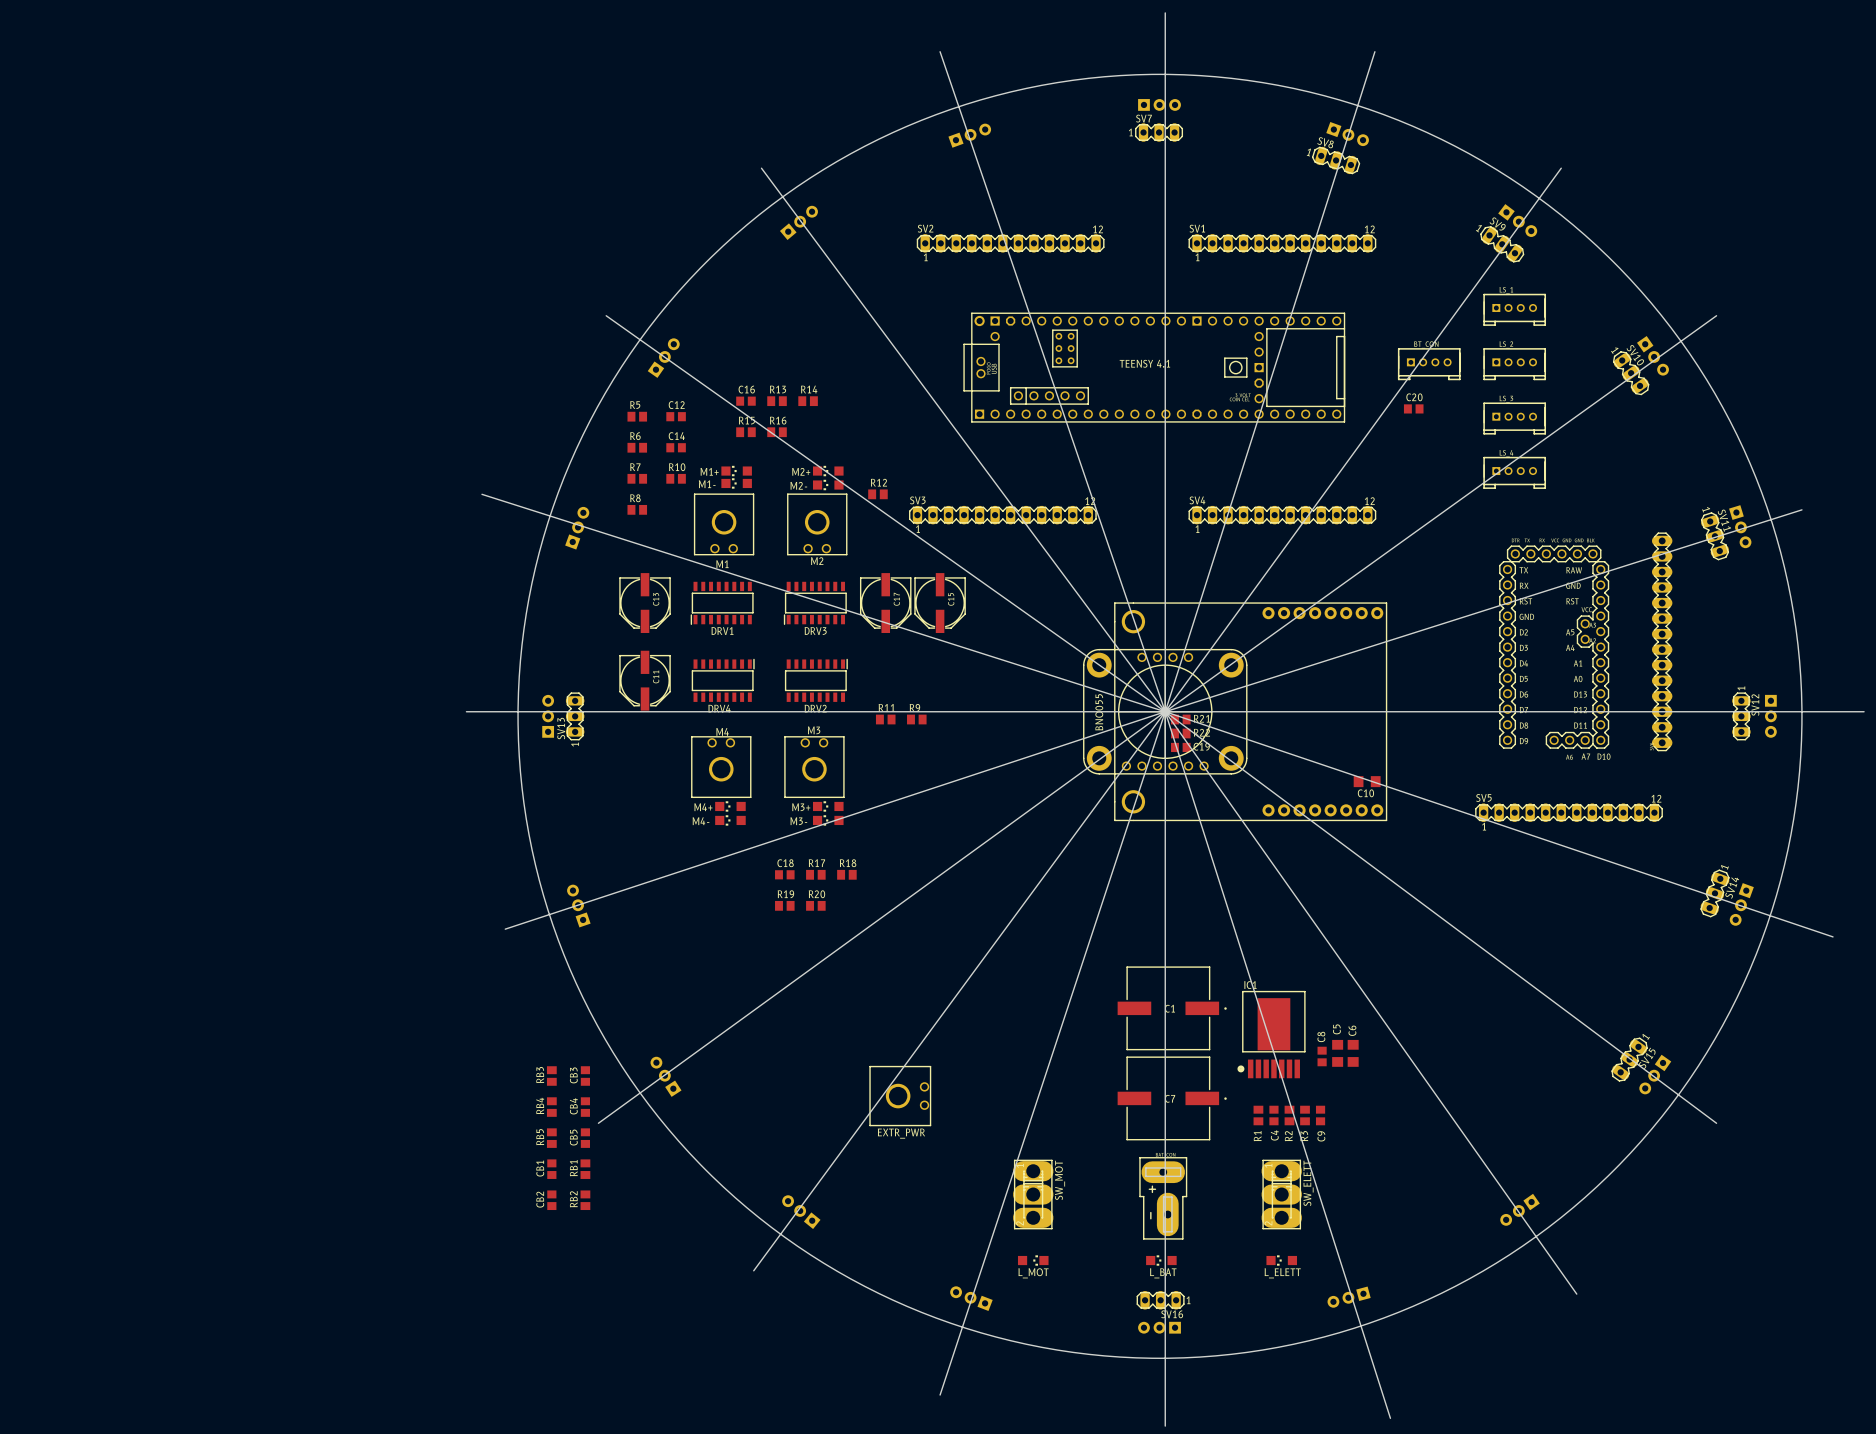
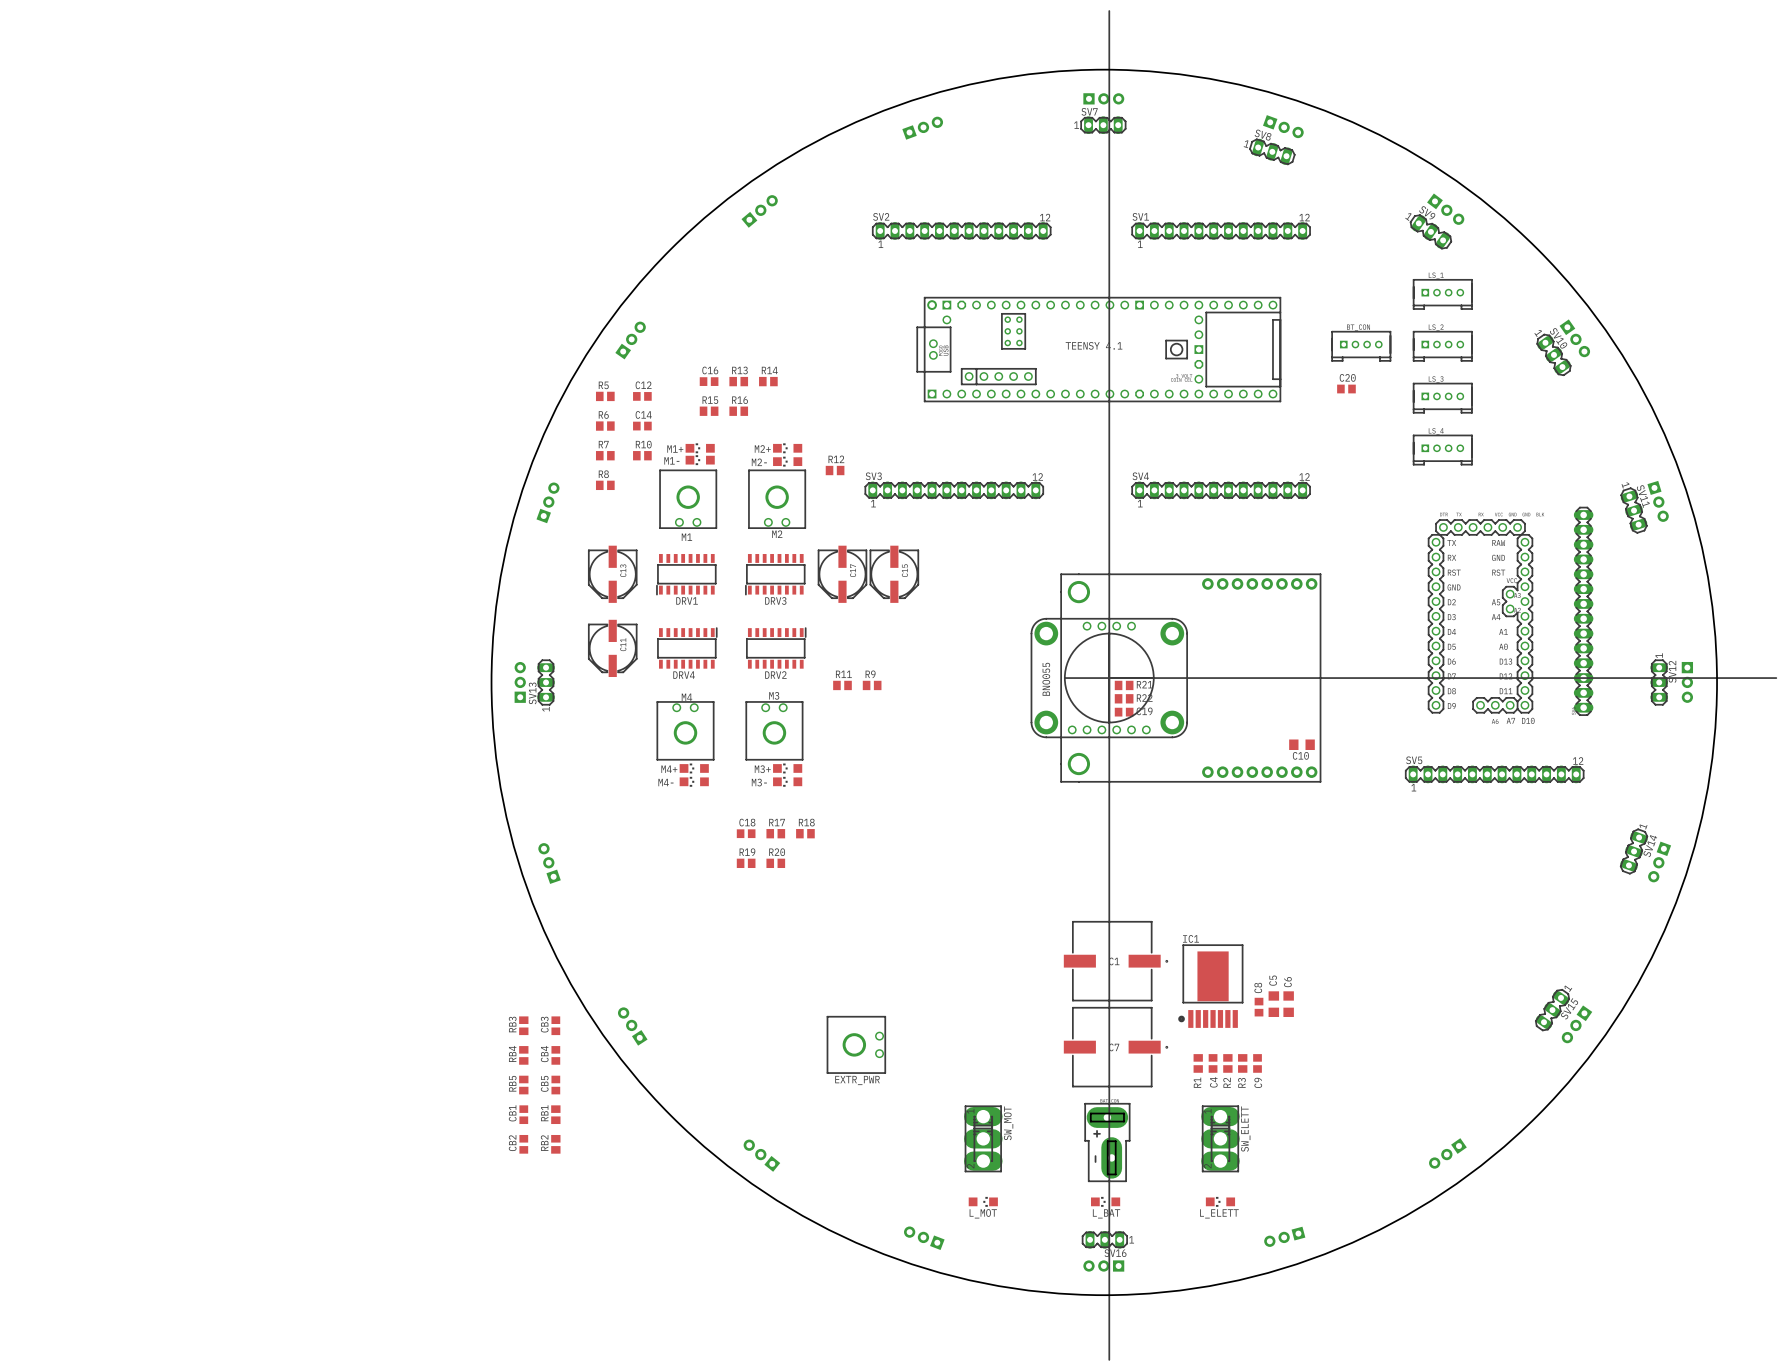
board edge: (1165, 12) (1165, 1426) -> none
line: none -> (1109, 11) (1109, 1359)
board edge: (940, 51) (1165, 711) -> none
board edge: (1374, 51) (1165, 711) -> none
board edge: (761, 168) (1165, 711) -> none
board edge: (1561, 168) (1165, 711) -> none
board edge: (606, 315) (1165, 711) -> none
board edge: (1716, 315) (1165, 711) -> none
board edge: (481, 494) (1165, 711) -> none
board edge: (1801, 509) (1165, 711) -> none
board edge: (466, 711) (1864, 711) -> none
board edge: (1165, 711) (1833, 936) -> none
board edge: (1165, 711) (1716, 1123) -> none
board edge: (1165, 711) (1576, 1294) -> none
board edge: (1165, 711) (1390, 1418) -> none
board edge: (1165, 711) (940, 1395) -> none
board edge: (1165, 711) (753, 1270) -> none
board edge: (1165, 711) (598, 1123) -> none
board edge: (1165, 711) (505, 929) -> none
line: none -> (1109, 678) (1776, 678)

